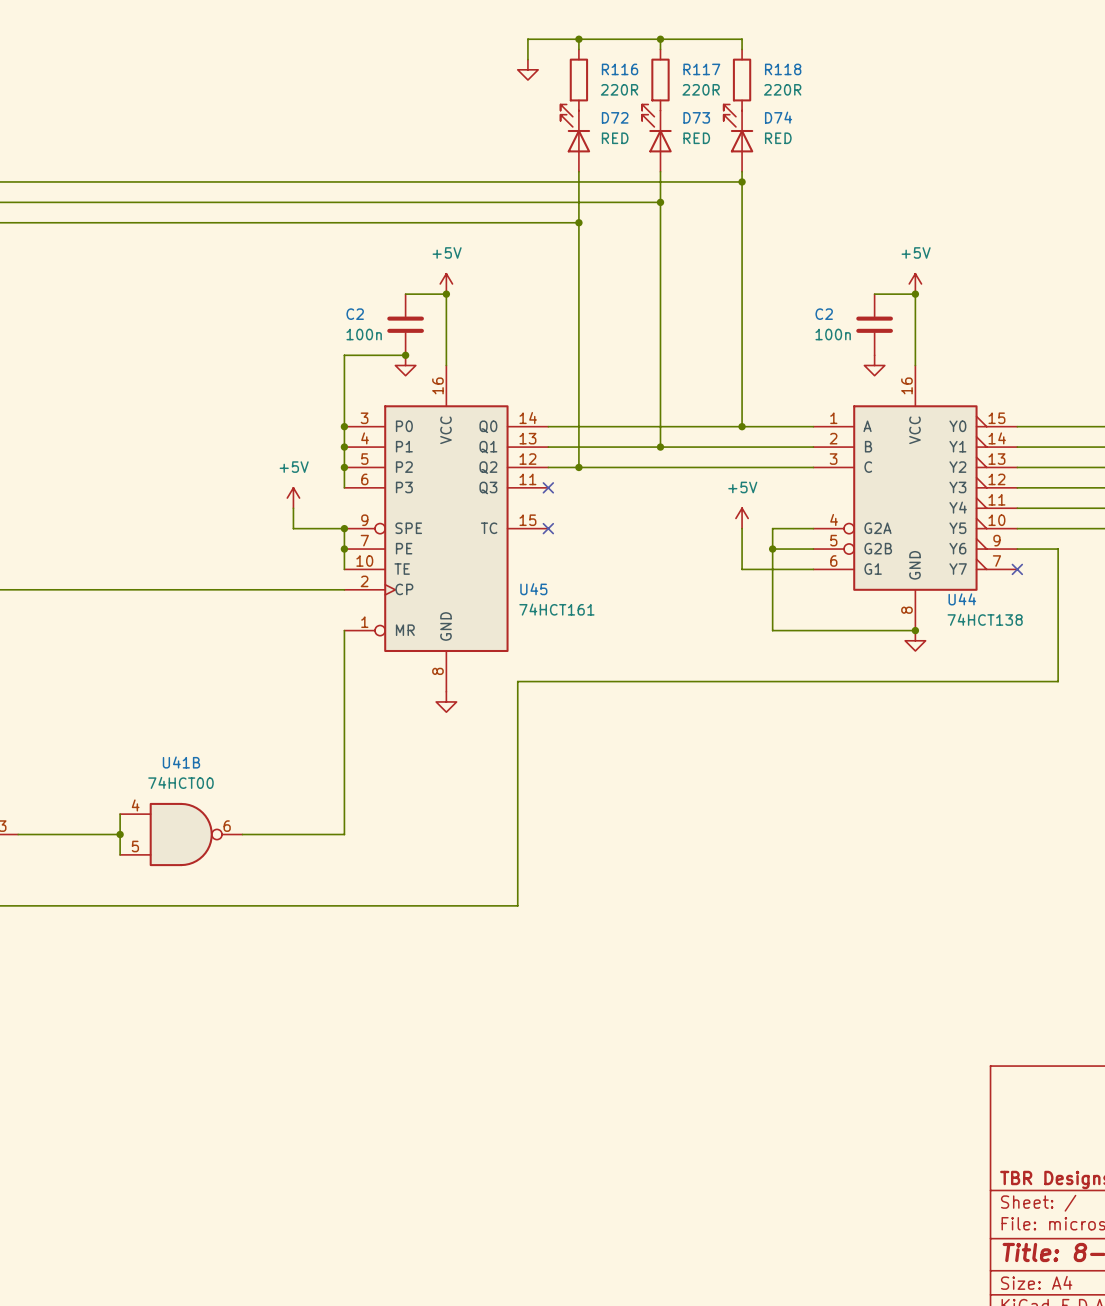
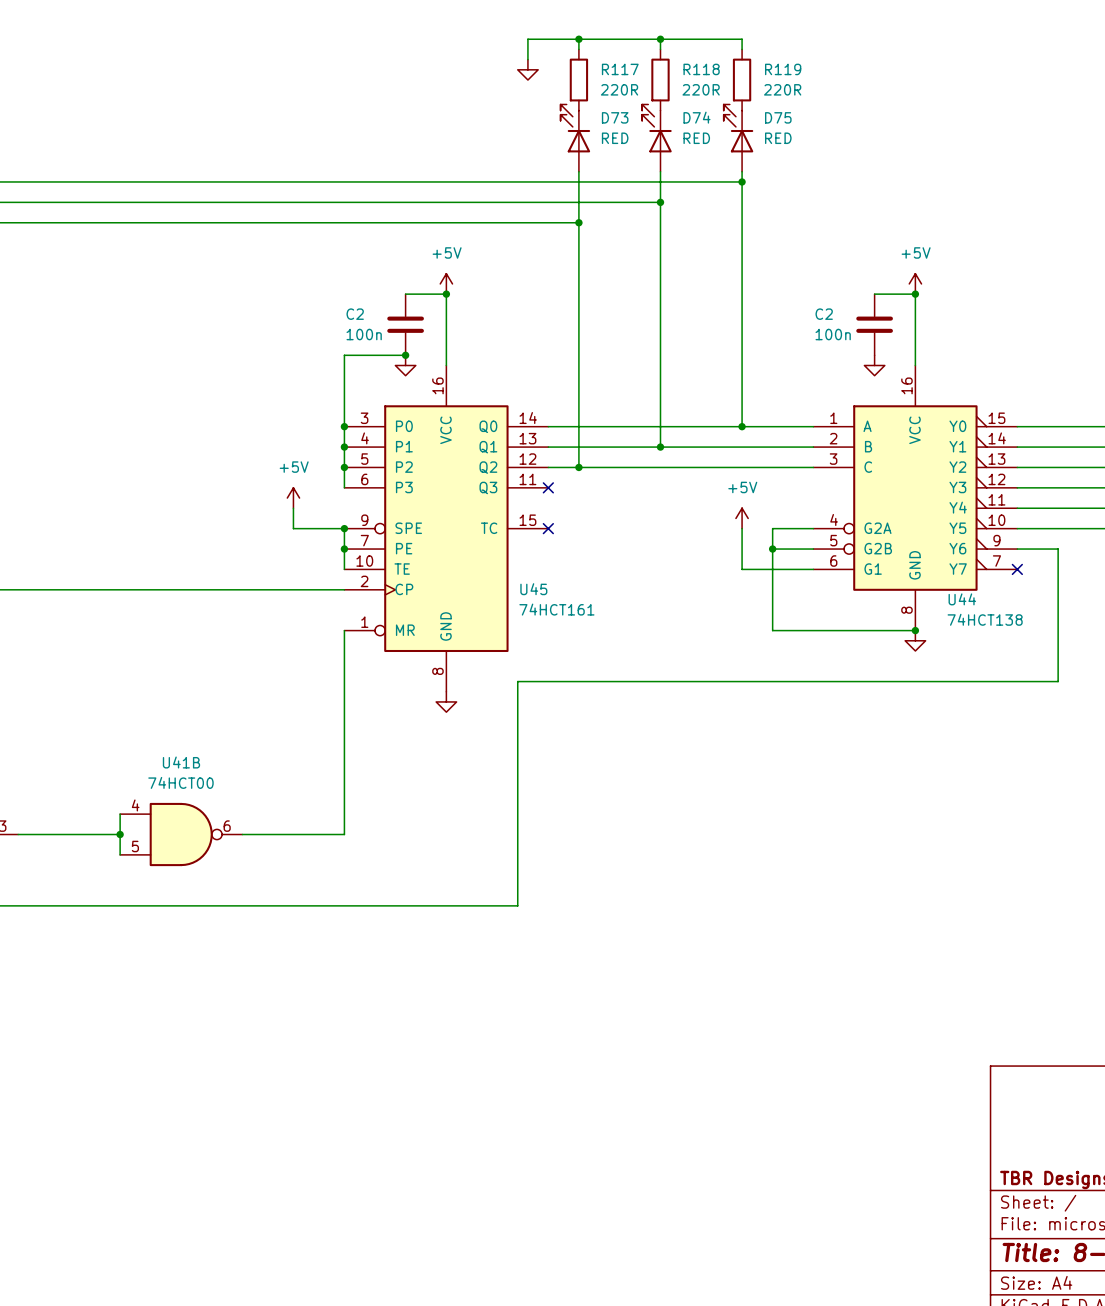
R116 name: R116 (620, 69) -> R117 (620, 69)
R117 name: R117 (701, 69) -> R118 (701, 69)
R118 name: R118 (783, 69) -> R119 (783, 69)
D72 name: D72 (615, 117) -> D73 (615, 117)
D73 name: D73 (696, 117) -> D74 (696, 117)
D74 name: D74 (778, 117) -> D75 (778, 117)

